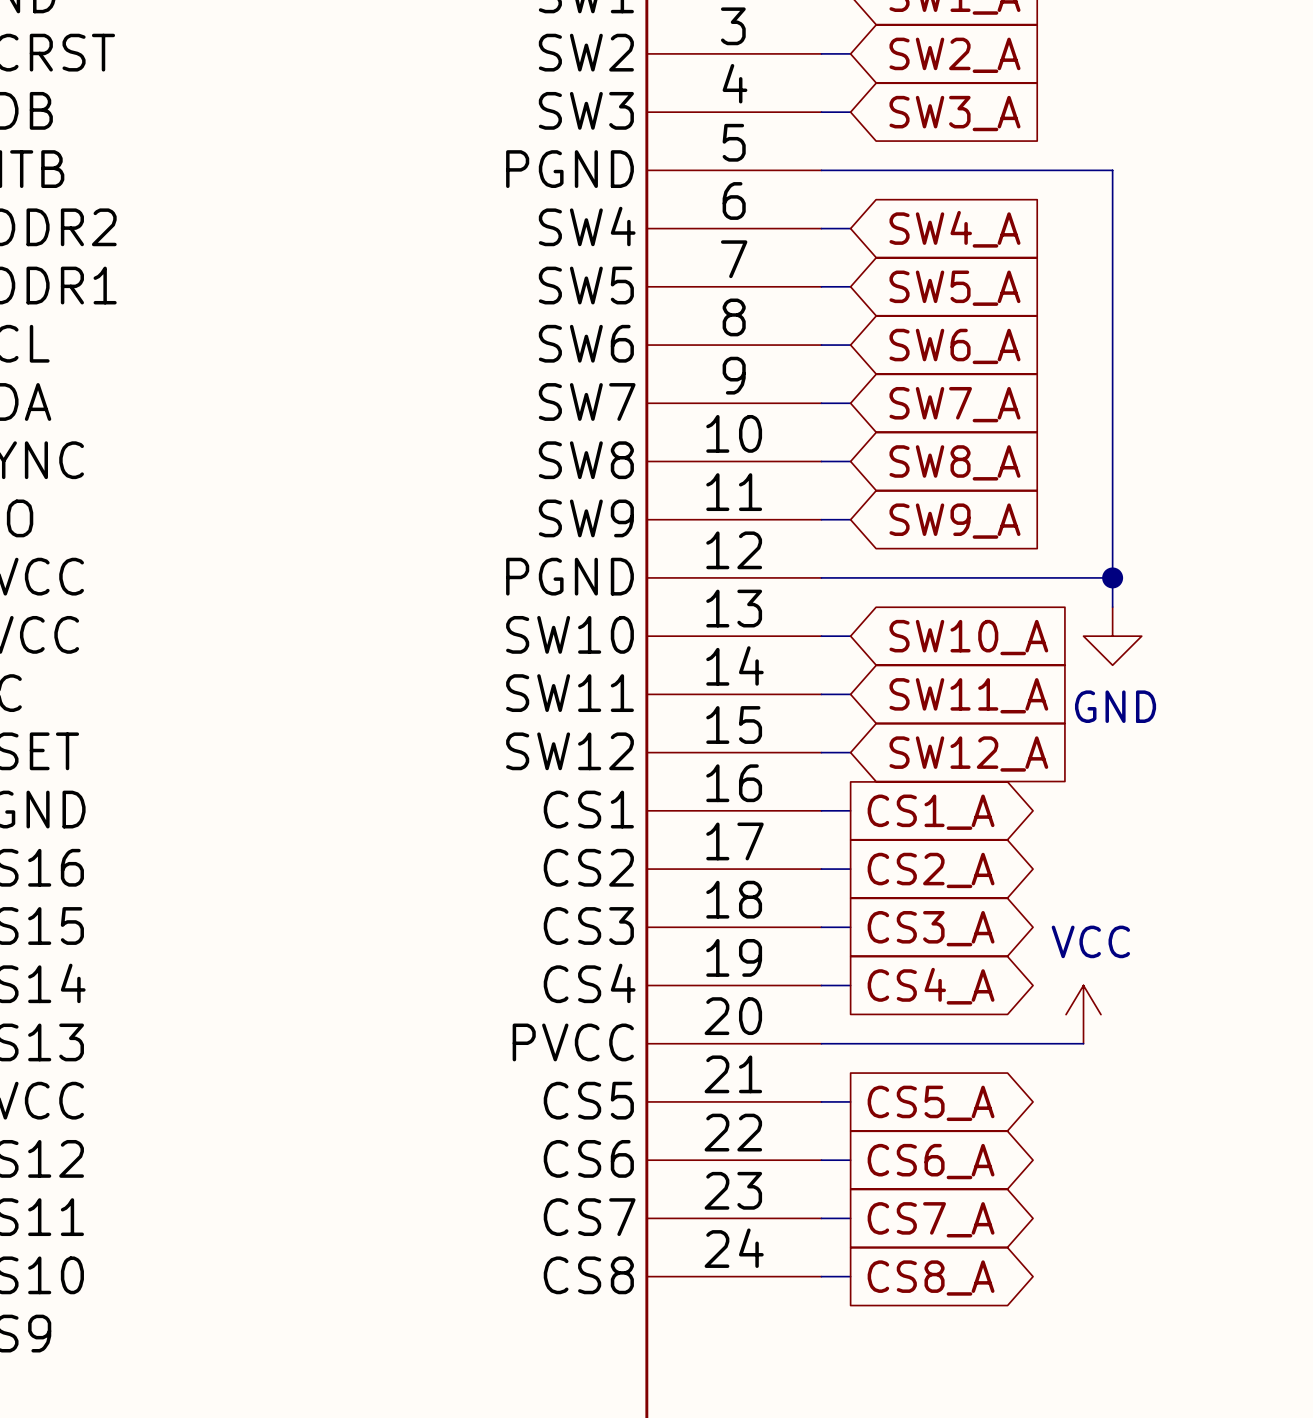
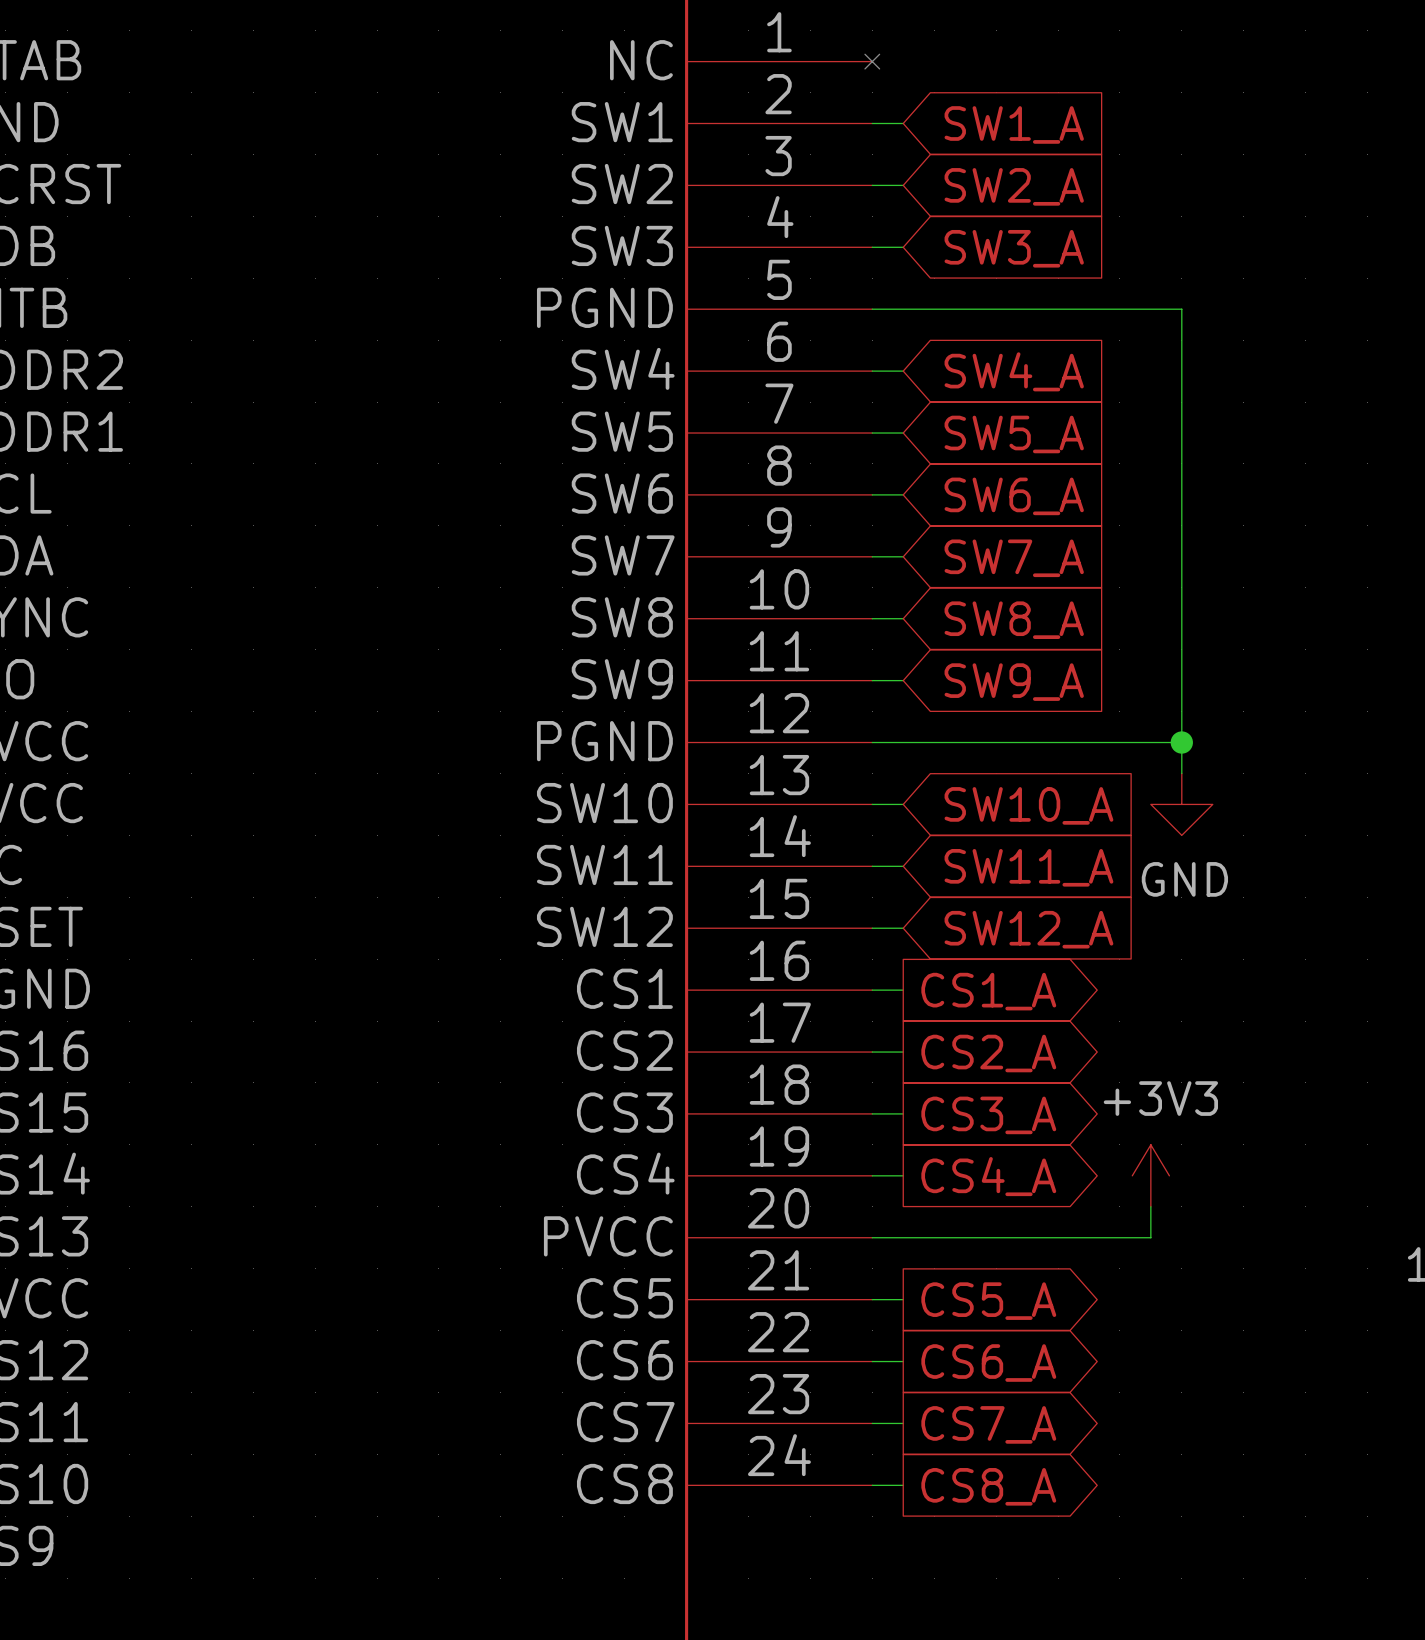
power symbol: none -> +3V3 (1150, 1175)
power symbol: VCC (1083, 1014) -> none

